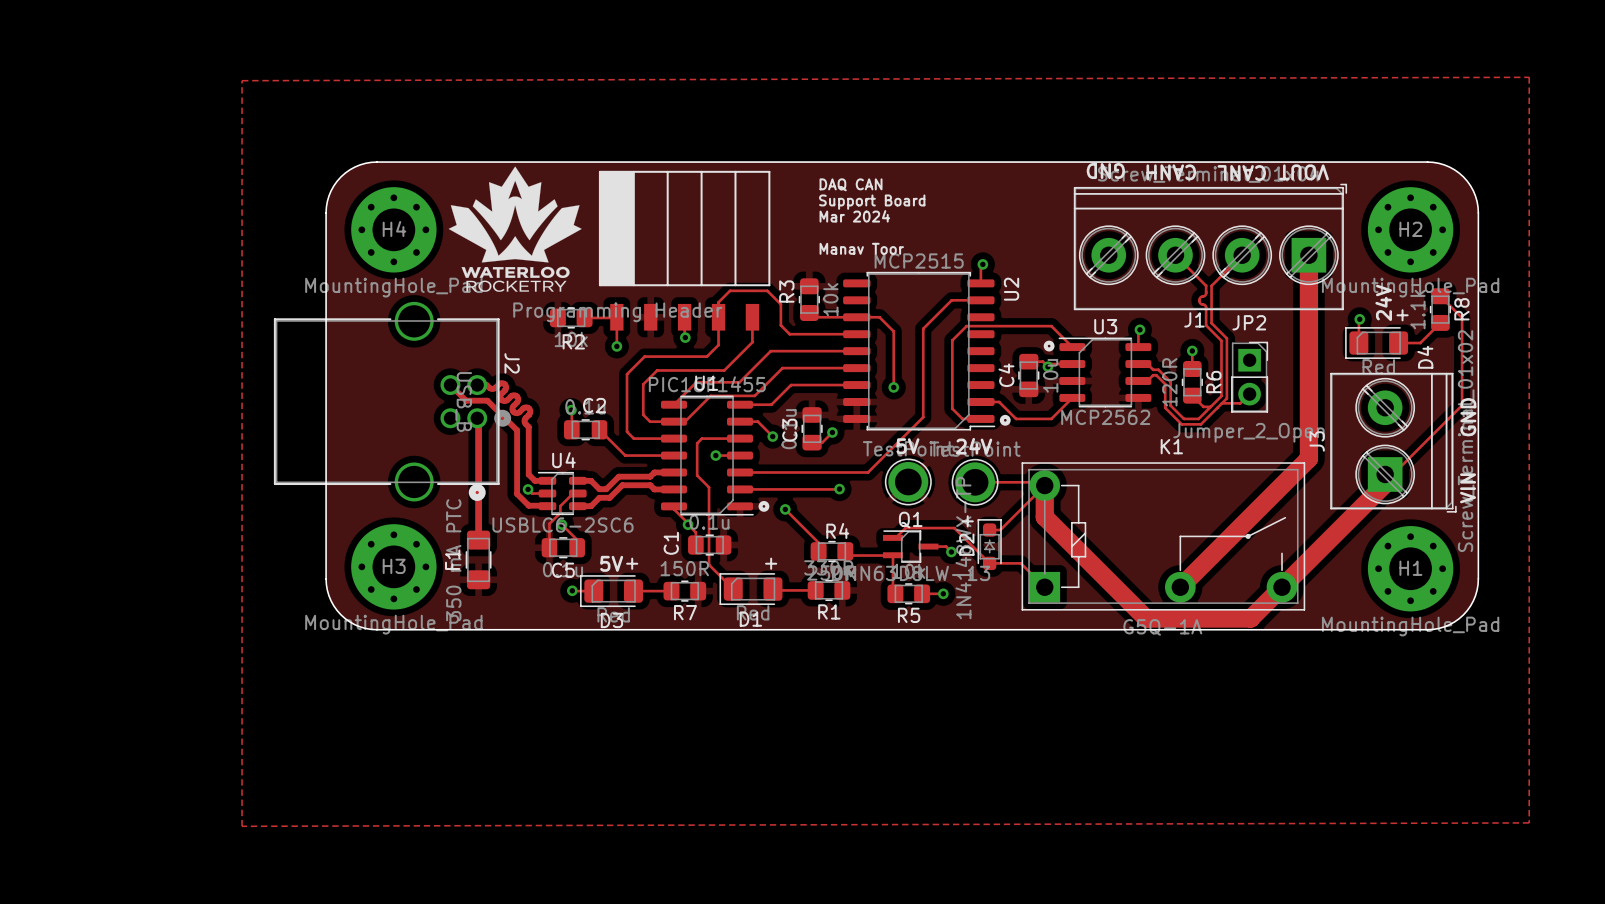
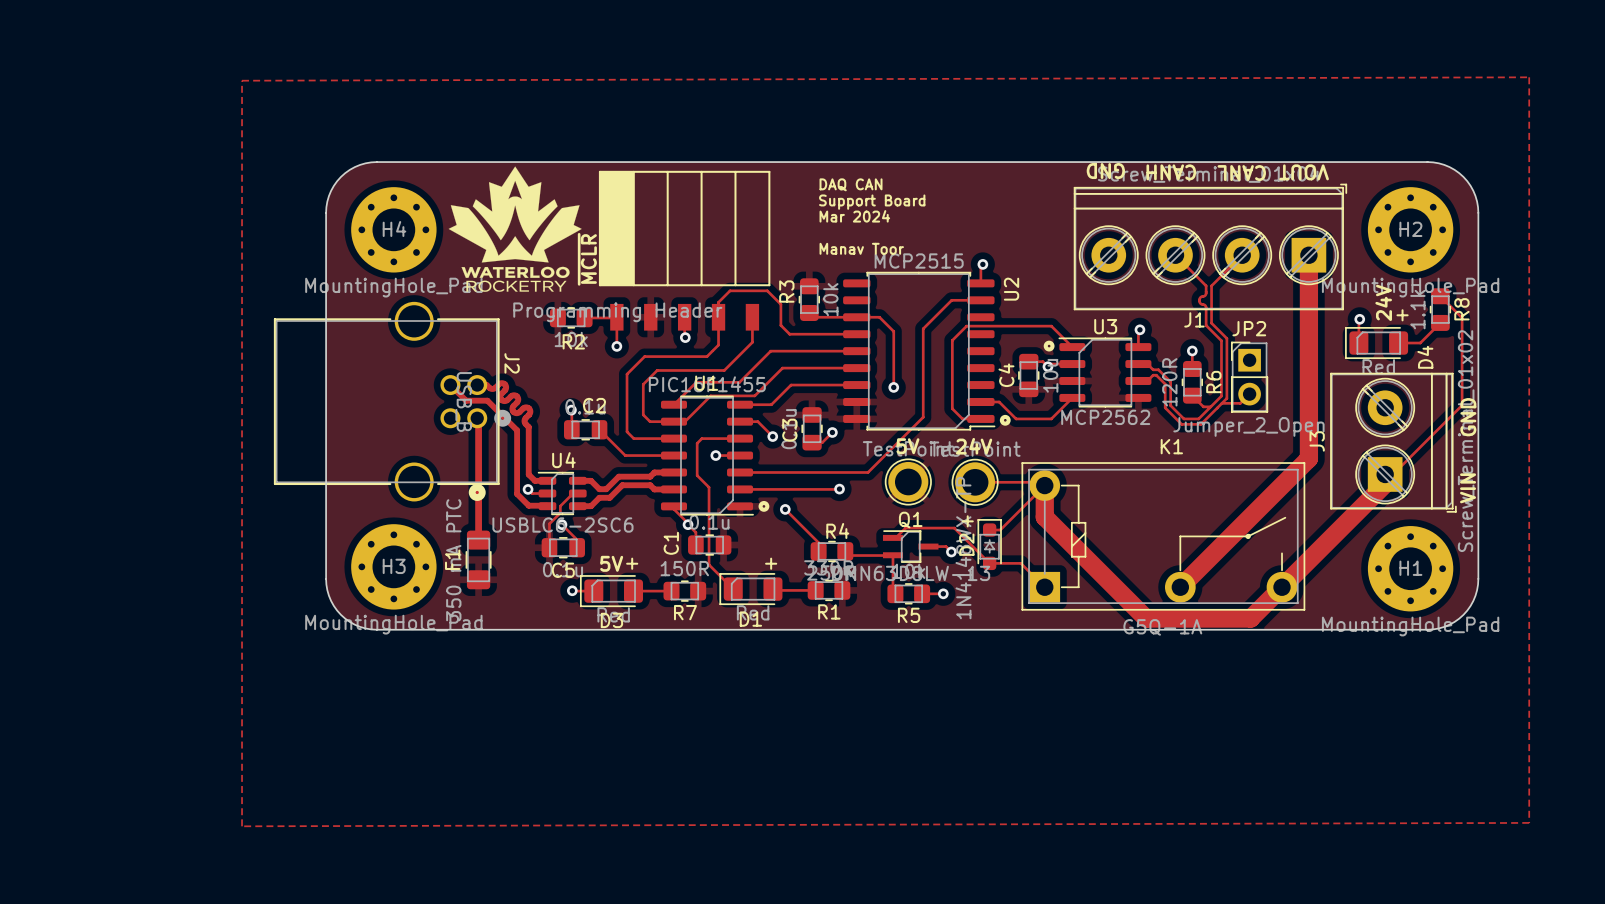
text: none -> ~{MCLR} (587, 259)
JP2 footprint: [1231, 341, 1269, 413] -> [1231, 341, 1269, 413]

